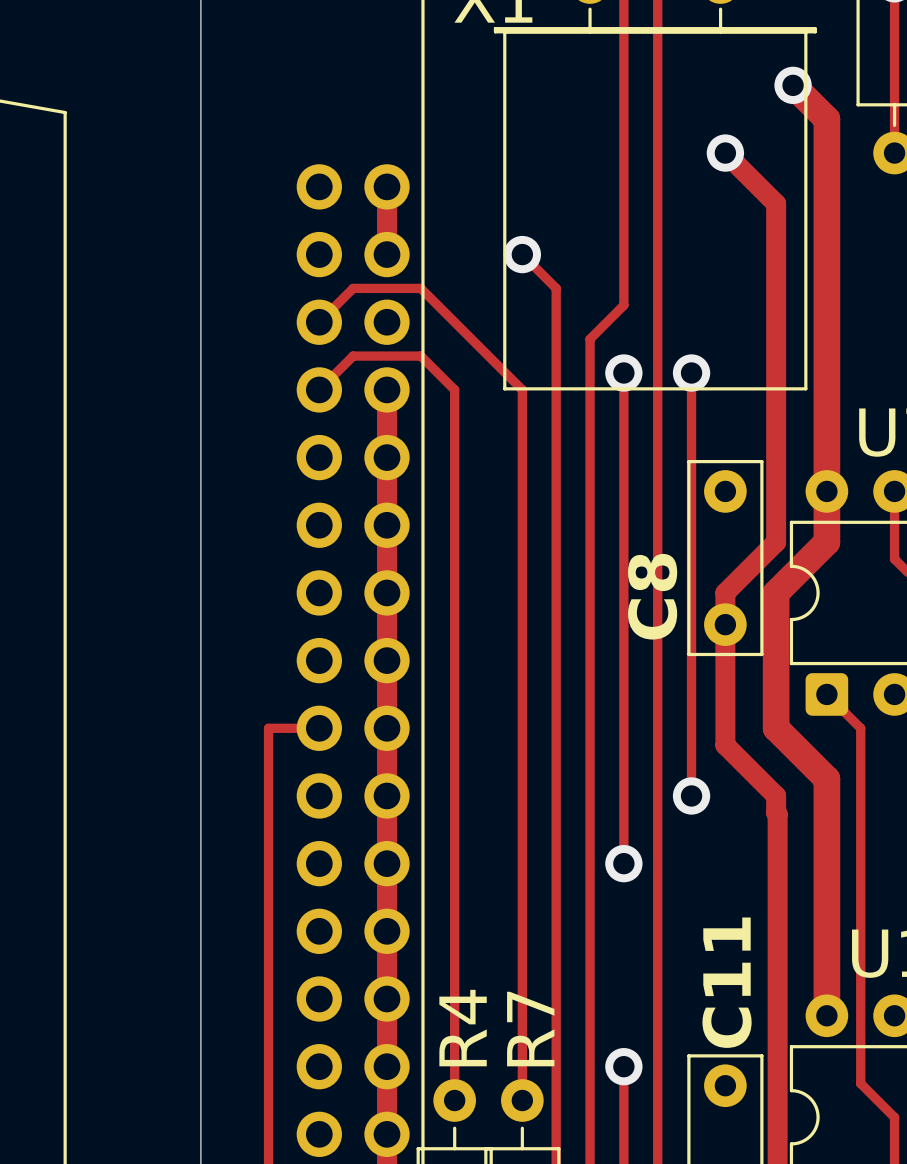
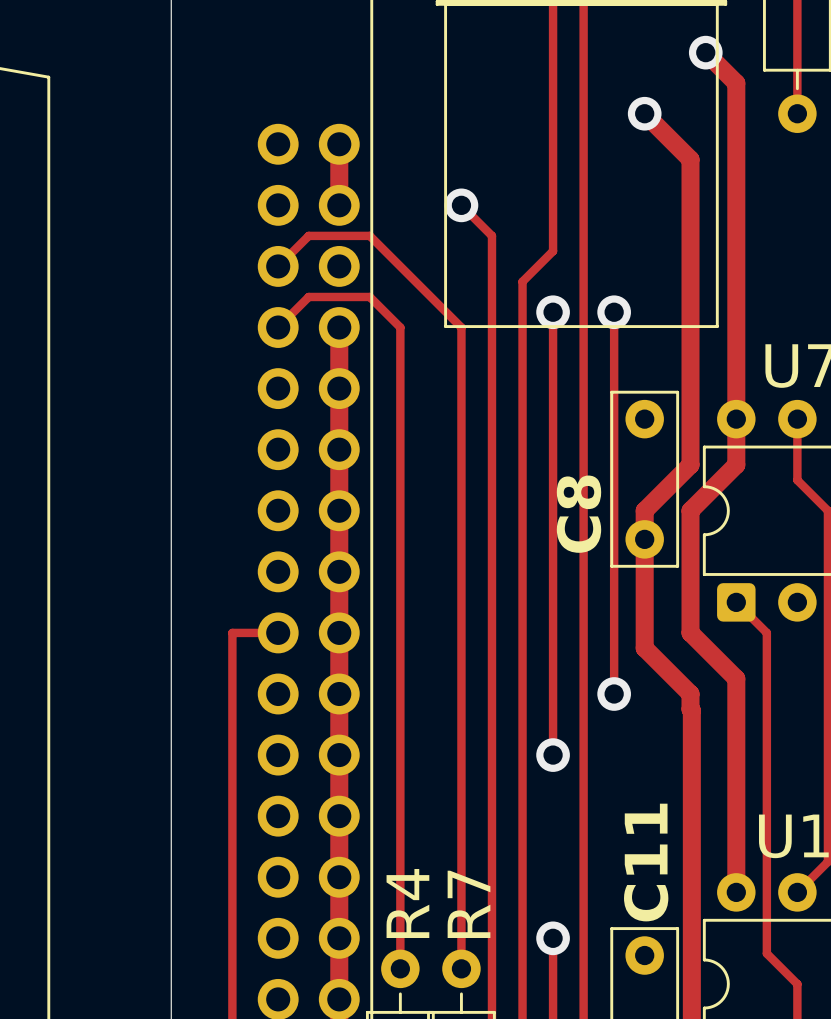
track width: thick (793, 85) (826, 119) (826, 542) (776, 592) (776, 728) (826, 779) (826, 1015) -> thin (705, 52) (736, 83) (736, 464) (690, 510) (690, 632) (736, 678) (736, 892)

